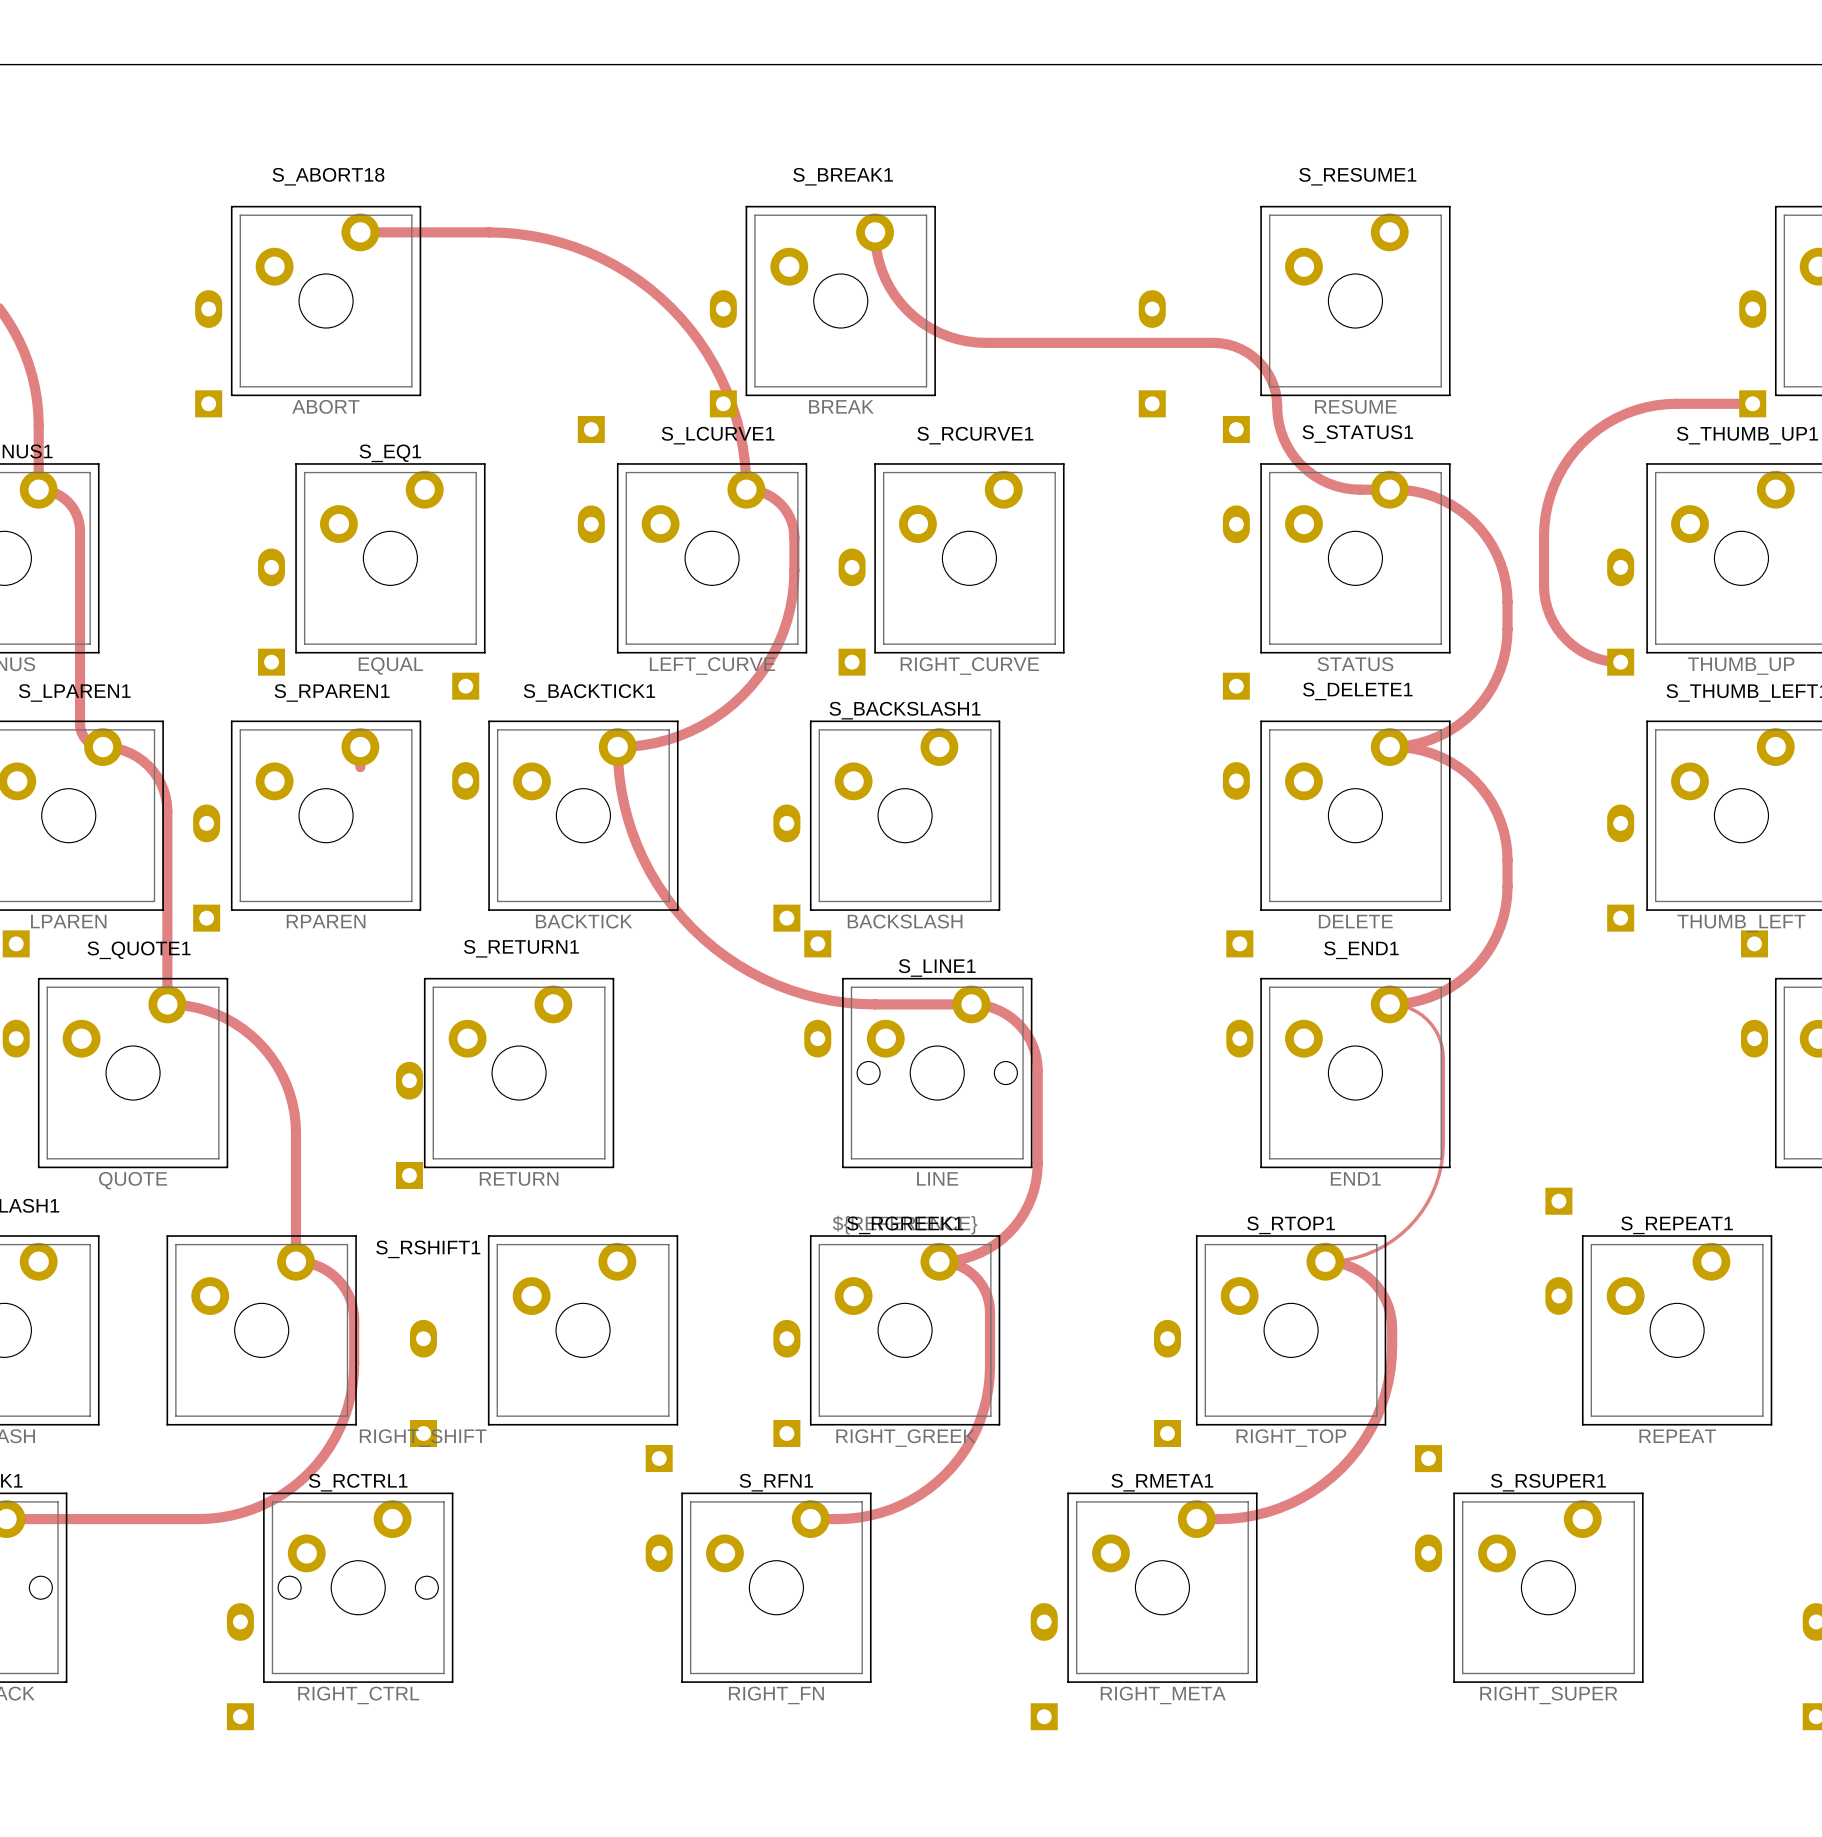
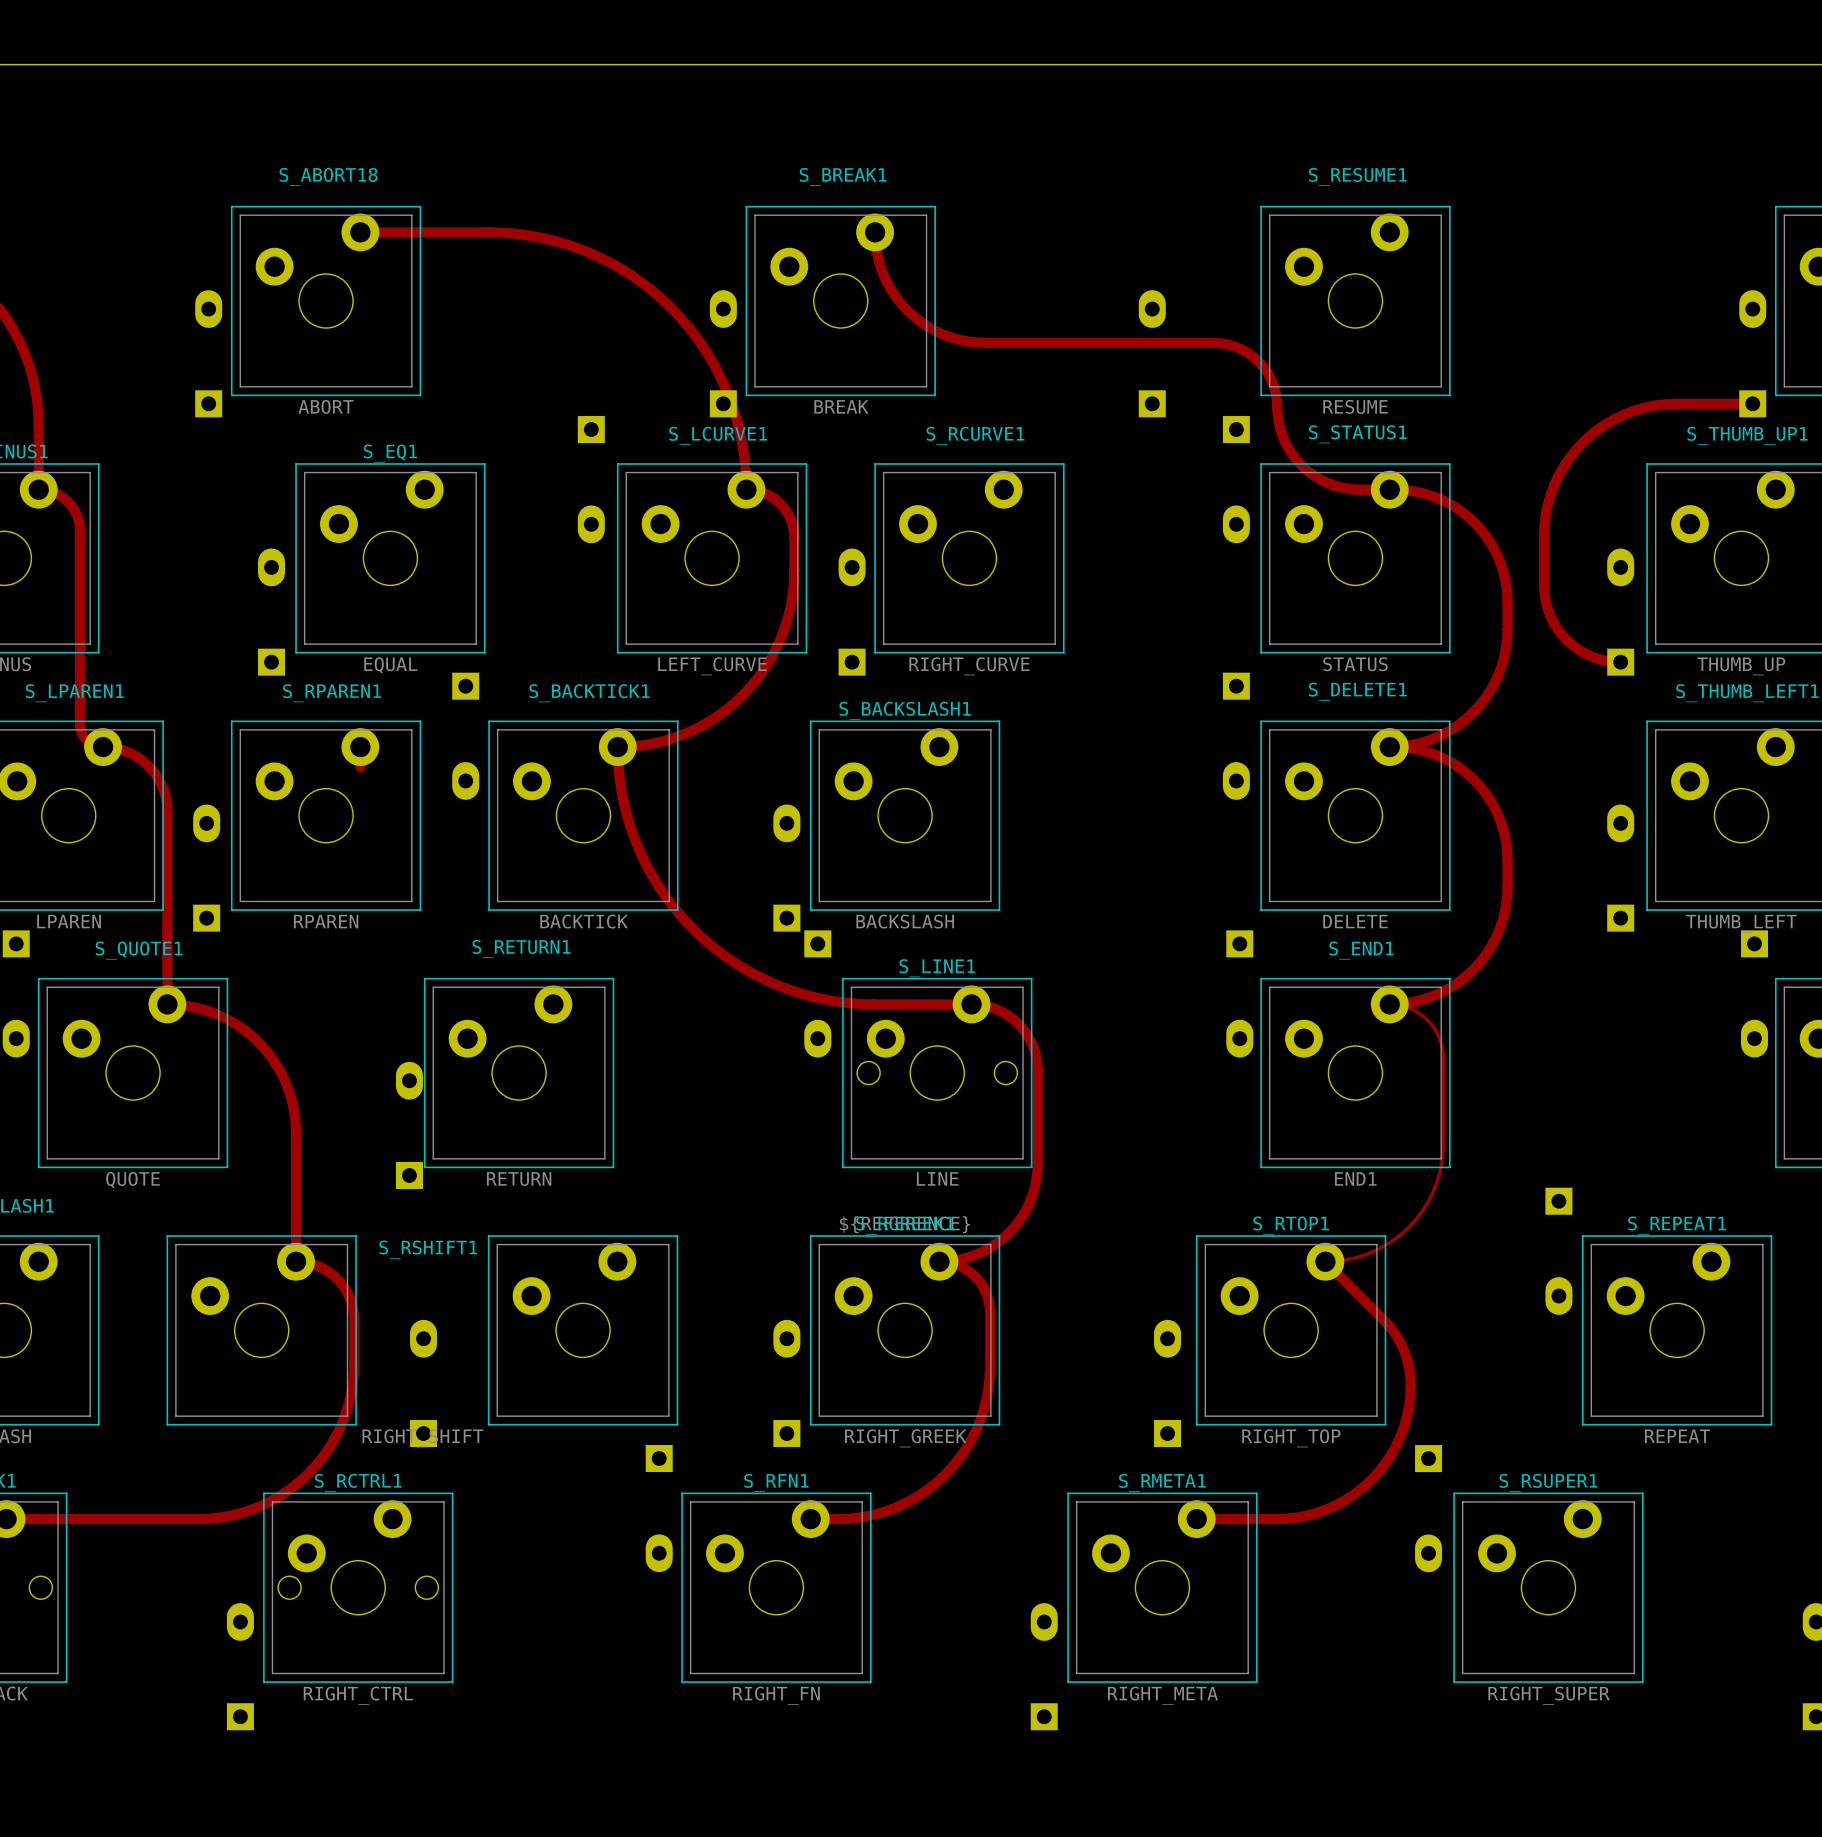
track: (1443, 1143) (1441, 1164) (1436, 1184) (1427, 1202) (1408, 1227) (1393, 1240) (1375, 1250) (1355, 1257) (1325, 1261) (1347, 1265) (1367, 1276) (1381, 1292) (1390, 1313) (1392, 1346) (1388, 1382) (1376, 1417) (1364, 1439) (1349, 1459) (1332, 1476) (1302, 1497) (1279, 1508) (1255, 1515) (1219, 1519) -> (1443, 1143) (1441, 1164) (1436, 1184) (1427, 1202) (1408, 1227) (1393, 1240) (1375, 1250) (1355, 1257) (1325, 1261) (1390, 1327) (1399, 1341) (1406, 1358) (1410, 1384) (1409, 1405) (1400, 1436) (1390, 1454) (1378, 1472) (1363, 1486) (1346, 1499) (1327, 1508) (1307, 1515) (1287, 1518) (1219, 1519)

